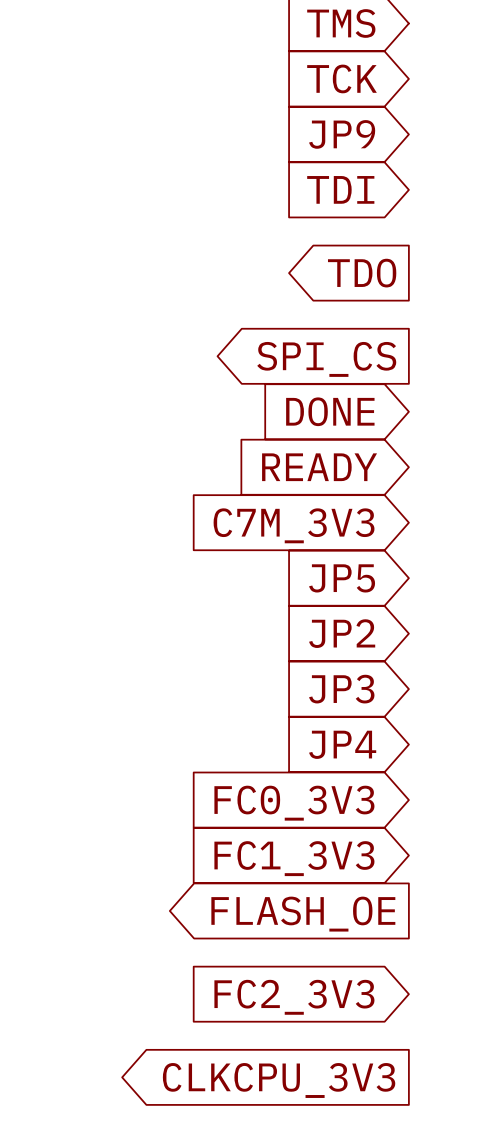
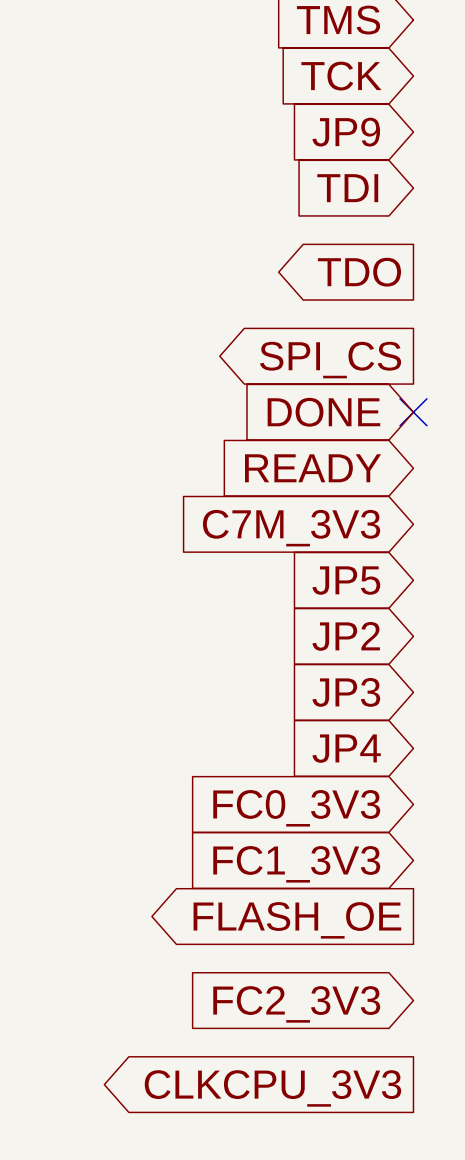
no-connect mark: none -> (413, 412)

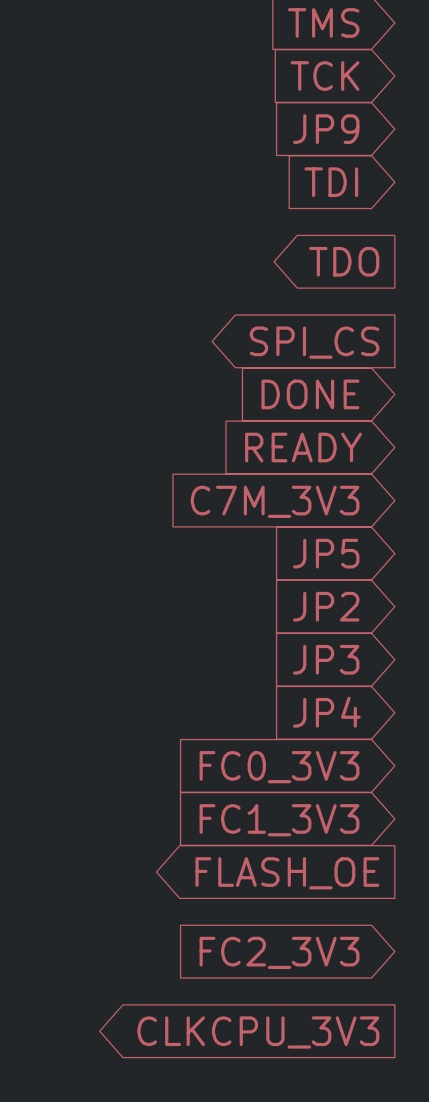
no-connect mark: (413, 412) -> none

